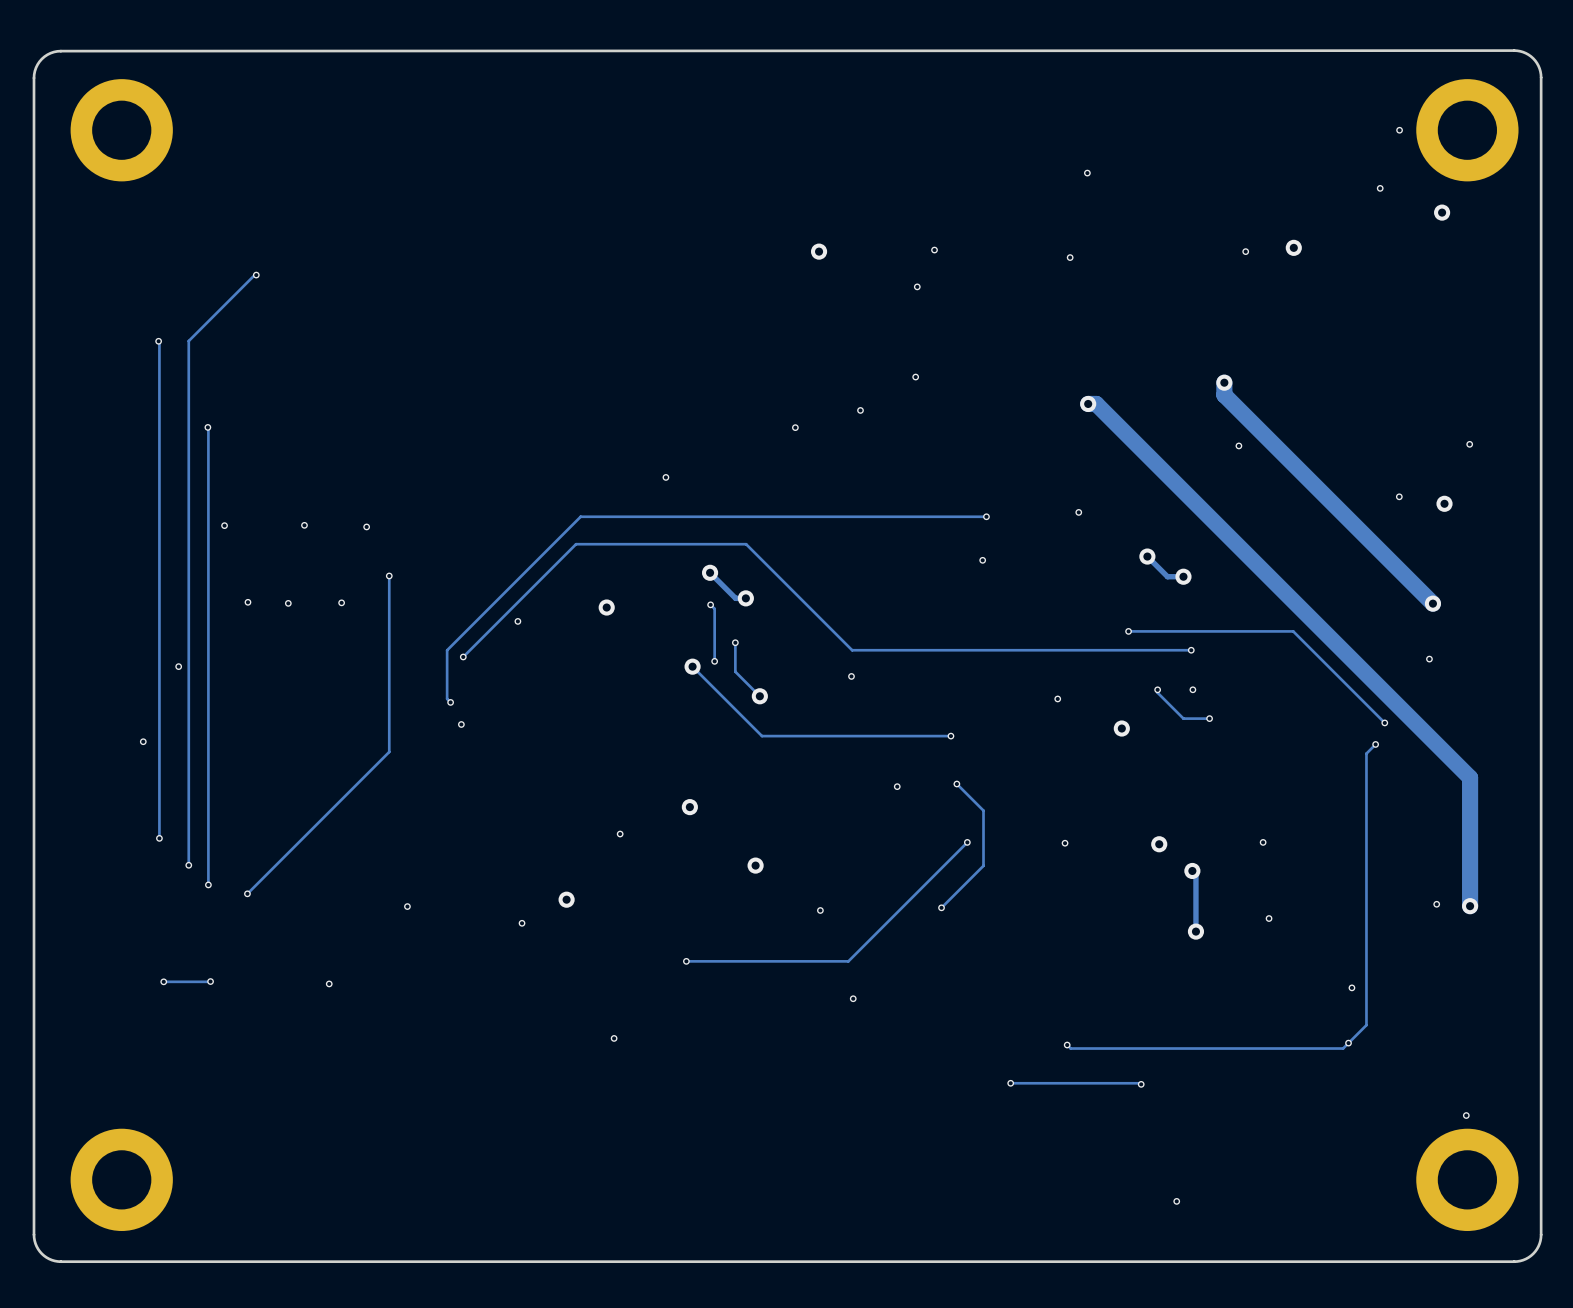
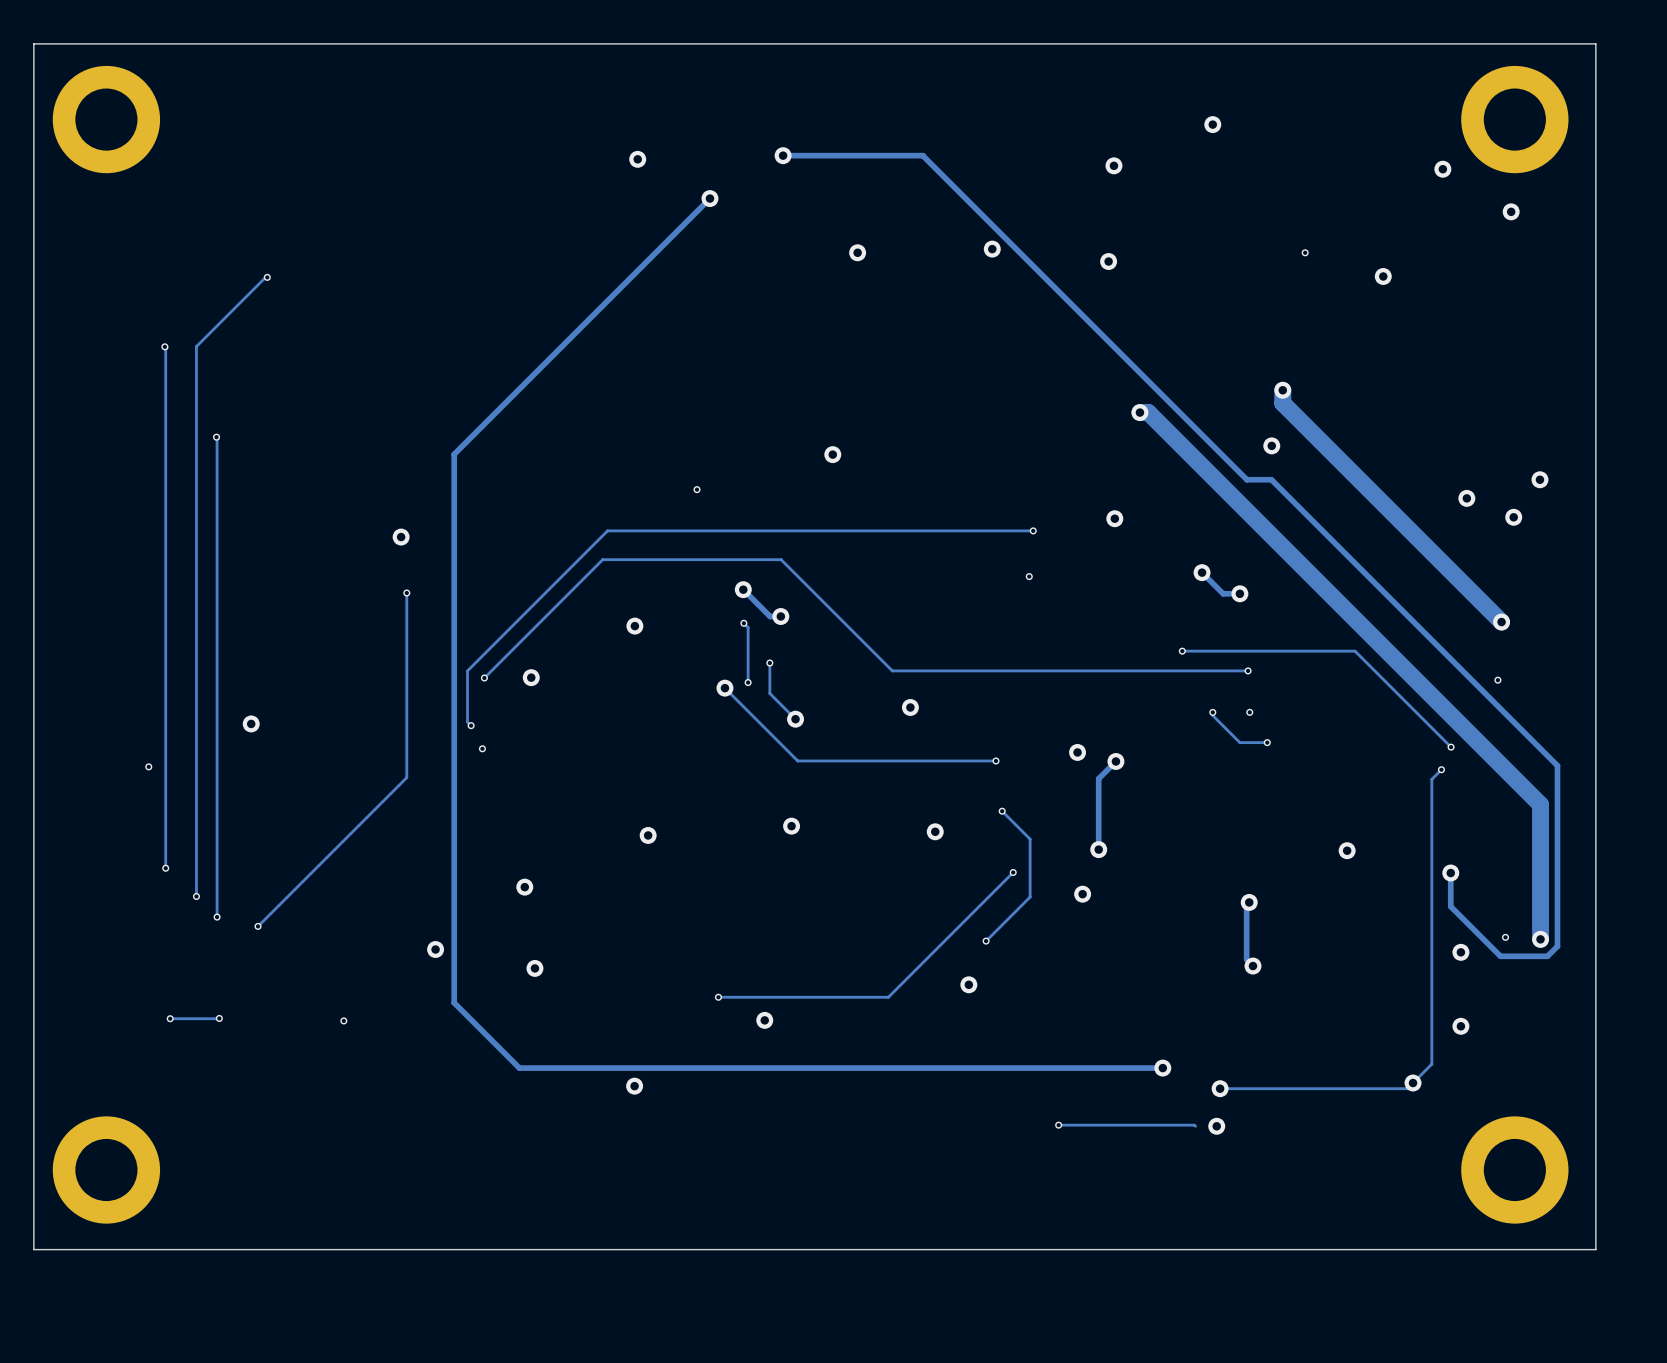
board edge: (1514, 50) (60, 51) (44, 56) (37, 64) (34, 78) (34, 1234) (35, 1243) (39, 1251) (49, 1259) (60, 1261) (1514, 1261) (1523, 1260) (1531, 1255) (1538, 1246) (1541, 1234) (1541, 77) (1539, 68) (1533, 58) (1523, 52) (1514, 50) -> (1595, 43) (1595, 1249) (33, 1249) (33, 43) (1595, 43)
via: none -> (1212, 124)
part position: (121, 130) -> (106, 119)
via: (1399, 130) -> none
part position: (1467, 130) -> (1514, 119)
track: none -> (783, 155) (922, 155) (1246, 479) (1271, 479) (1557, 765) (1557, 946) (1547, 956) (1500, 956) (1450, 906) (1450, 873)
via: none -> (783, 155)
via: none -> (637, 159)
via: none -> (1113, 165)
via: none -> (1442, 169)
via: (1087, 173) -> none
via: (1380, 188) -> none
track: none -> (709, 198) (454, 454) (454, 1002) (519, 1068) (1162, 1068)
via: none -> (709, 198)
via position: (1293, 247) -> (1383, 276)
via: none -> (992, 249)
via: (934, 250) -> none
via: (1070, 257) -> none
via: none -> (1108, 261)
via: (917, 286) -> none
via: (915, 377) -> none
via: (860, 410) -> none
via: (795, 427) -> none
via: none -> (1271, 445)
via: none -> (832, 454)
via: (1469, 444) -> none
via: (1238, 445) -> none
via: none -> (1539, 479)
via size: [1395, 493, 1403, 501] -> [1458, 489, 1476, 507]
via: none -> (1114, 518)
via: (1078, 512) -> none
via: none -> (401, 537)
via: (224, 525) -> none
via: (304, 525) -> none
via: (366, 526) -> none
via: (247, 602) -> none
via: (341, 602) -> none
via: (288, 603) -> none
via: (517, 621) -> none
via: none -> (531, 677)
via: (178, 666) -> none
via: (851, 676) -> none
via: none -> (910, 707)
via: (1057, 698) -> none
via: none -> (251, 723)
via: none -> (1077, 752)
via: (1121, 728) -> none
track: none -> (1115, 761) (1098, 778) (1098, 849)
via: none -> (1115, 761)
via: (897, 786) -> none
via: none -> (791, 826)
via: none -> (935, 831)
via: none -> (648, 835)
via: (689, 807) -> none
via: none -> (1098, 849)
via: none -> (1347, 850)
via: (620, 834) -> none
via: (1263, 842) -> none
via: none -> (1450, 873)
via: (1065, 843) -> none
via: (1159, 844) -> none
via: none -> (524, 887)
via: none -> (1082, 894)
via: (755, 865) -> none
track: (1192, 870) (1195, 874) (1195, 931) -> none
track: none -> (1247, 902) (1246, 959)
via: (566, 899) -> none
via size: [404, 903, 411, 910] -> [427, 941, 445, 958]
via: (820, 910) -> none
via: (1269, 918) -> none
via: none -> (1460, 952)
via size: [518, 919, 526, 927] -> [526, 959, 544, 977]
via: none -> (968, 984)
via: none -> (764, 1020)
via: (1351, 987) -> none
via: none -> (1460, 1026)
via: (853, 998) -> none
via: none -> (1162, 1068)
via size: [610, 1035, 618, 1042] -> [626, 1077, 644, 1095]
via: none -> (1413, 1083)
track: (1067, 1045) (1070, 1048) (1164, 1048) -> none
via: (1067, 1045) -> none
via: none -> (1220, 1088)
via: (1141, 1084) -> none
via: none -> (1216, 1126)
via: (1466, 1115) -> none
part position: (121, 1179) -> (106, 1170)
part position: (1467, 1179) -> (1514, 1170)
via: (1176, 1201) -> none

